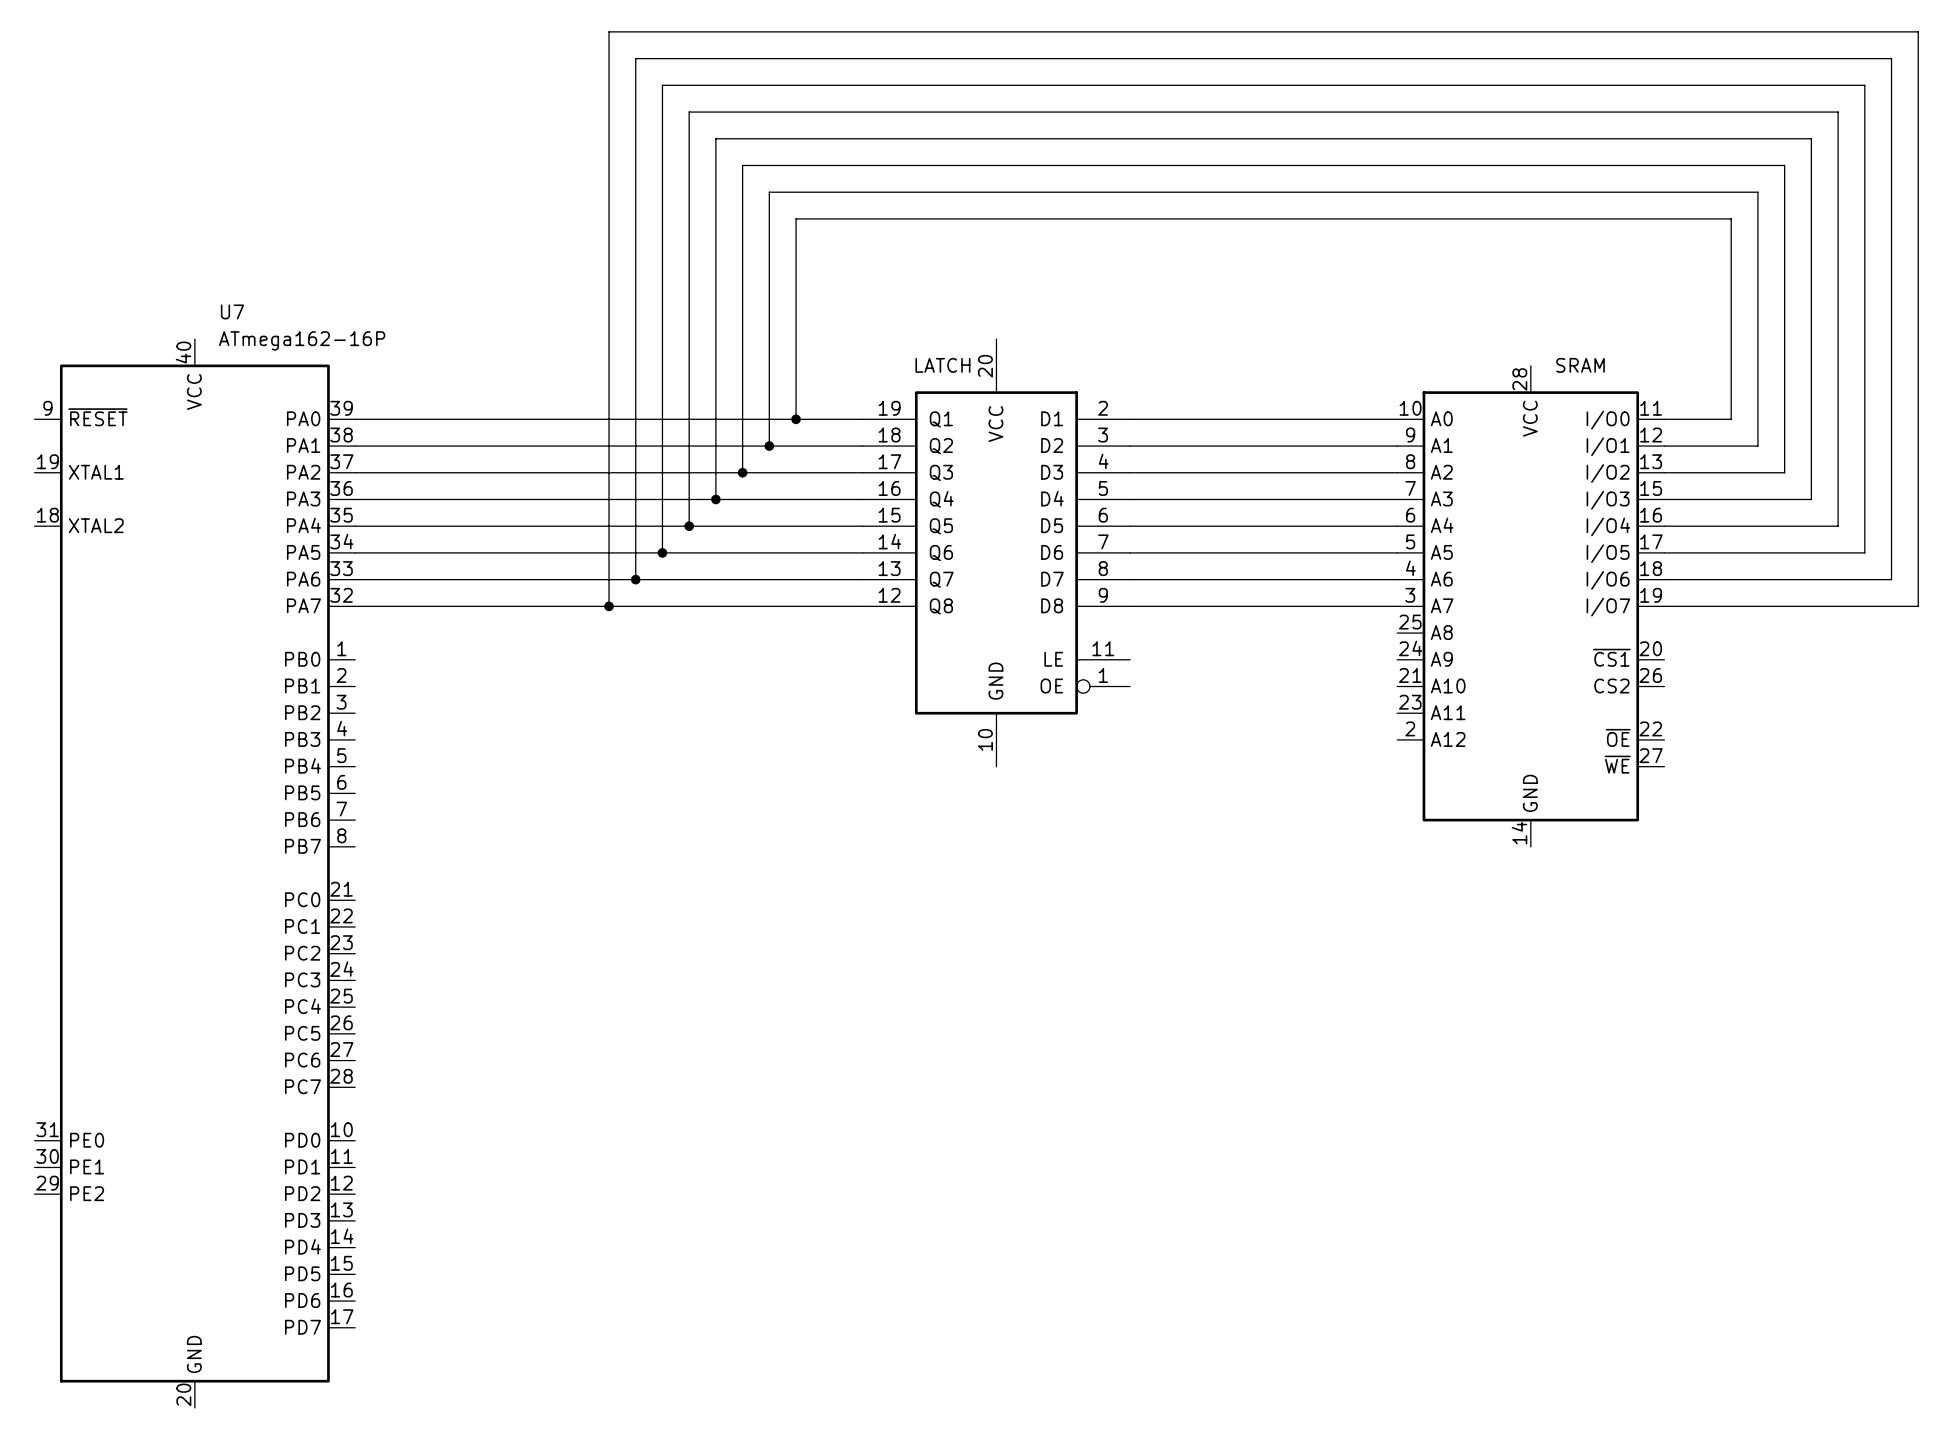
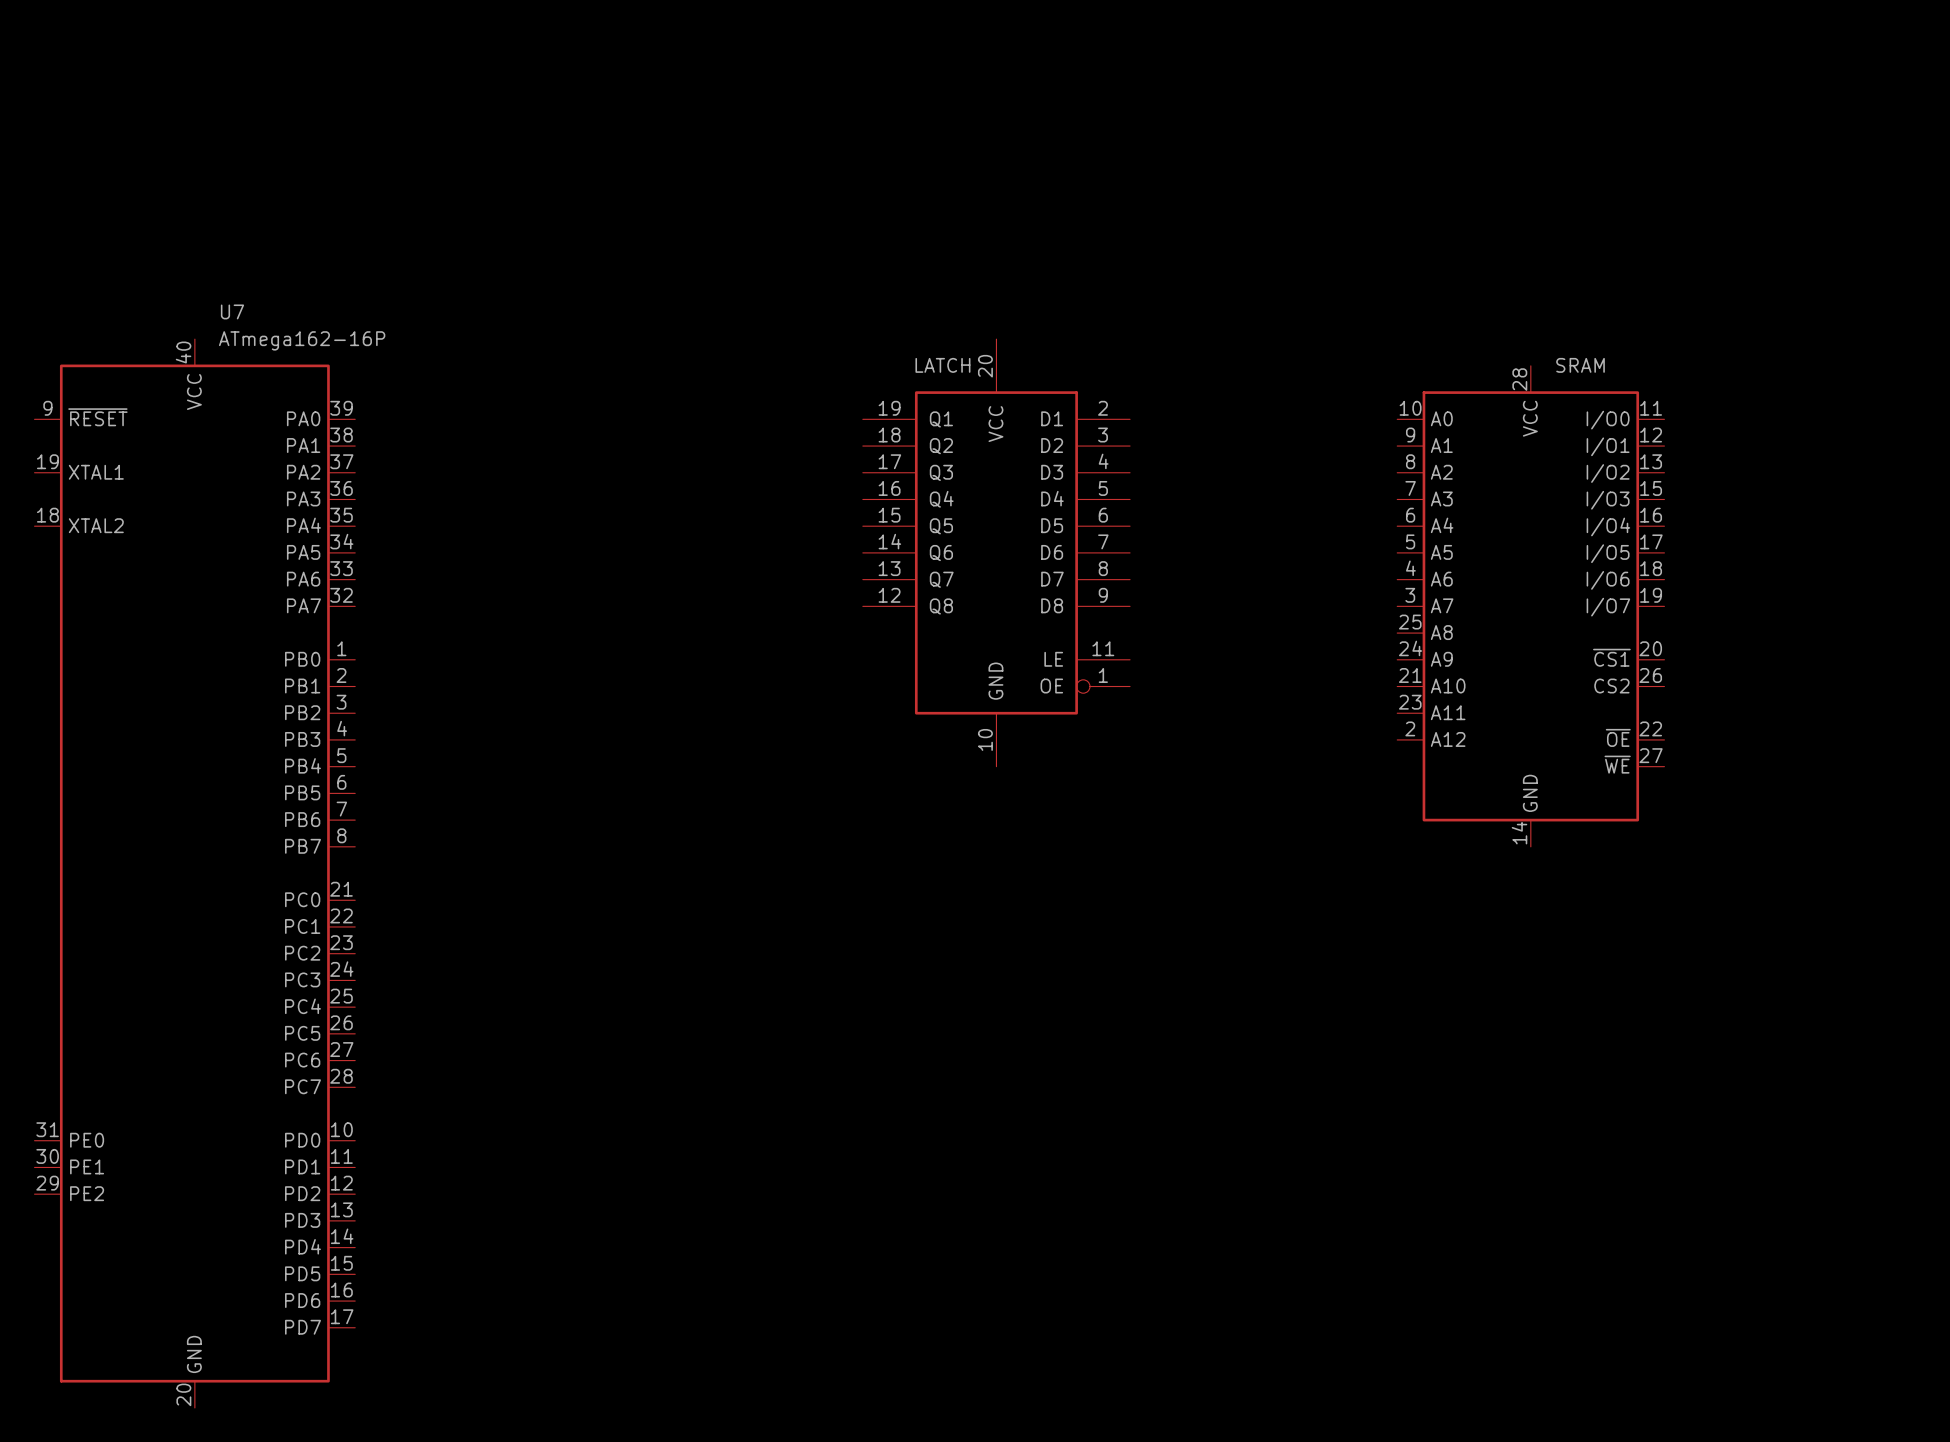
wire: (355, 419) (862, 419) -> none
wire: (796, 419) (796, 218) (1731, 218) (1731, 419) (1664, 419) -> none
junction: (796, 419) -> none
wire: (1130, 419) (1397, 419) -> none
wire: (355, 446) (862, 446) -> none
wire: (769, 446) (769, 192) (1757, 192) (1757, 446) (1664, 446) -> none
junction: (769, 446) -> none
wire: (1130, 446) (1397, 446) -> none
wire: (355, 472) (862, 472) -> none
wire: (742, 472) (742, 165) (1784, 165) (1784, 472) (1664, 472) -> none
junction: (742, 472) -> none
wire: (1130, 472) (1397, 472) -> none
wire: (355, 499) (862, 499) -> none
wire: (715, 499) (715, 138) (1811, 138) (1811, 499) (1664, 499) -> none
junction: (715, 499) -> none
wire: (1130, 499) (1397, 499) -> none
wire: (355, 526) (862, 526) -> none
wire: (689, 526) (689, 112) (1838, 112) (1838, 526) (1664, 526) -> none
junction: (689, 526) -> none
wire: (1130, 526) (1397, 526) -> none
wire: (355, 552) (862, 552) -> none
wire: (662, 552) (662, 85) (1864, 85) (1864, 552) (1664, 552) -> none
junction: (662, 552) -> none
wire: (1130, 552) (1397, 552) -> none
wire: (355, 579) (862, 579) -> none
wire: (635, 579) (635, 58) (1891, 58) (1891, 579) (1664, 579) -> none
junction: (635, 579) -> none
wire: (1130, 579) (1397, 579) -> none
wire: (355, 606) (862, 606) -> none
wire: (609, 606) (609, 31) (1918, 31) (1918, 606) (1664, 606) -> none
junction: (609, 606) -> none
wire: (1130, 606) (1397, 606) -> none

